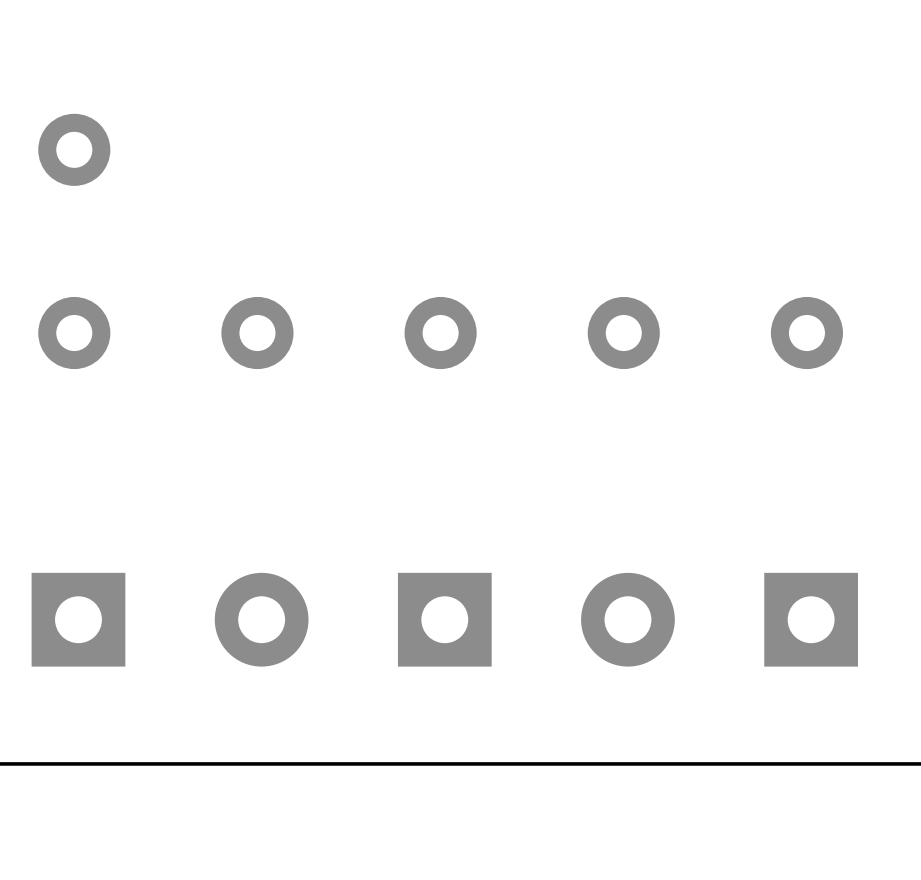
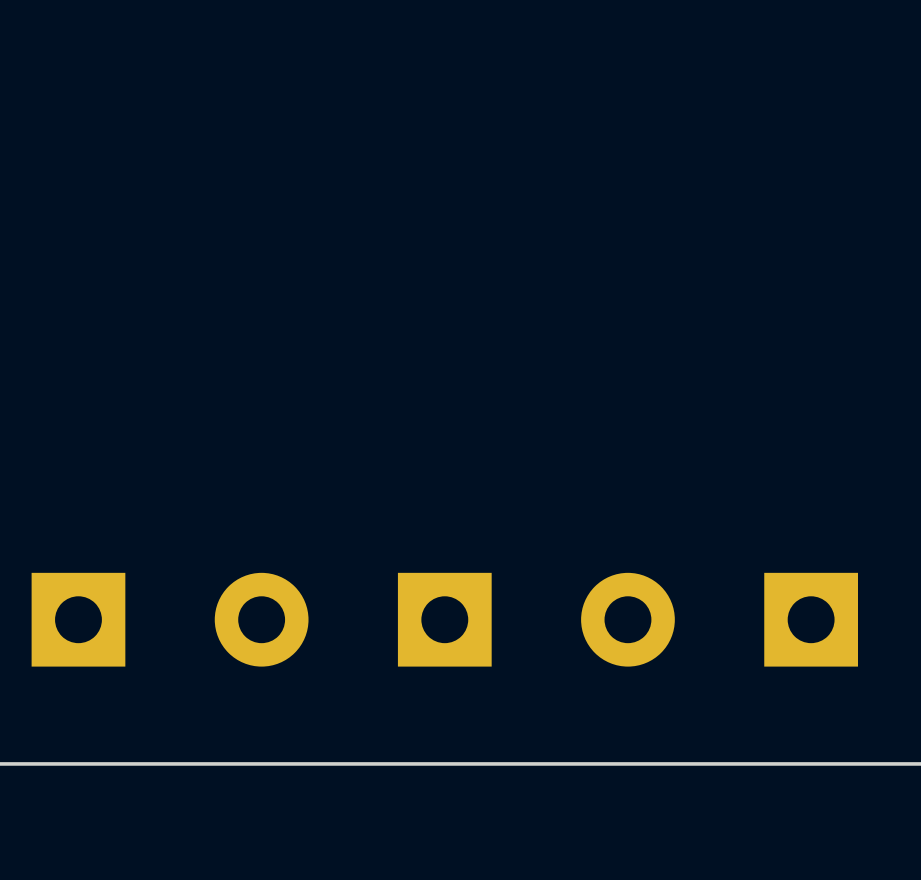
part: (74, 149) -> none
part: (74, 333) -> none
part: (257, 333) -> none
part: (440, 333) -> none
part: (623, 333) -> none
part: (806, 333) -> none

